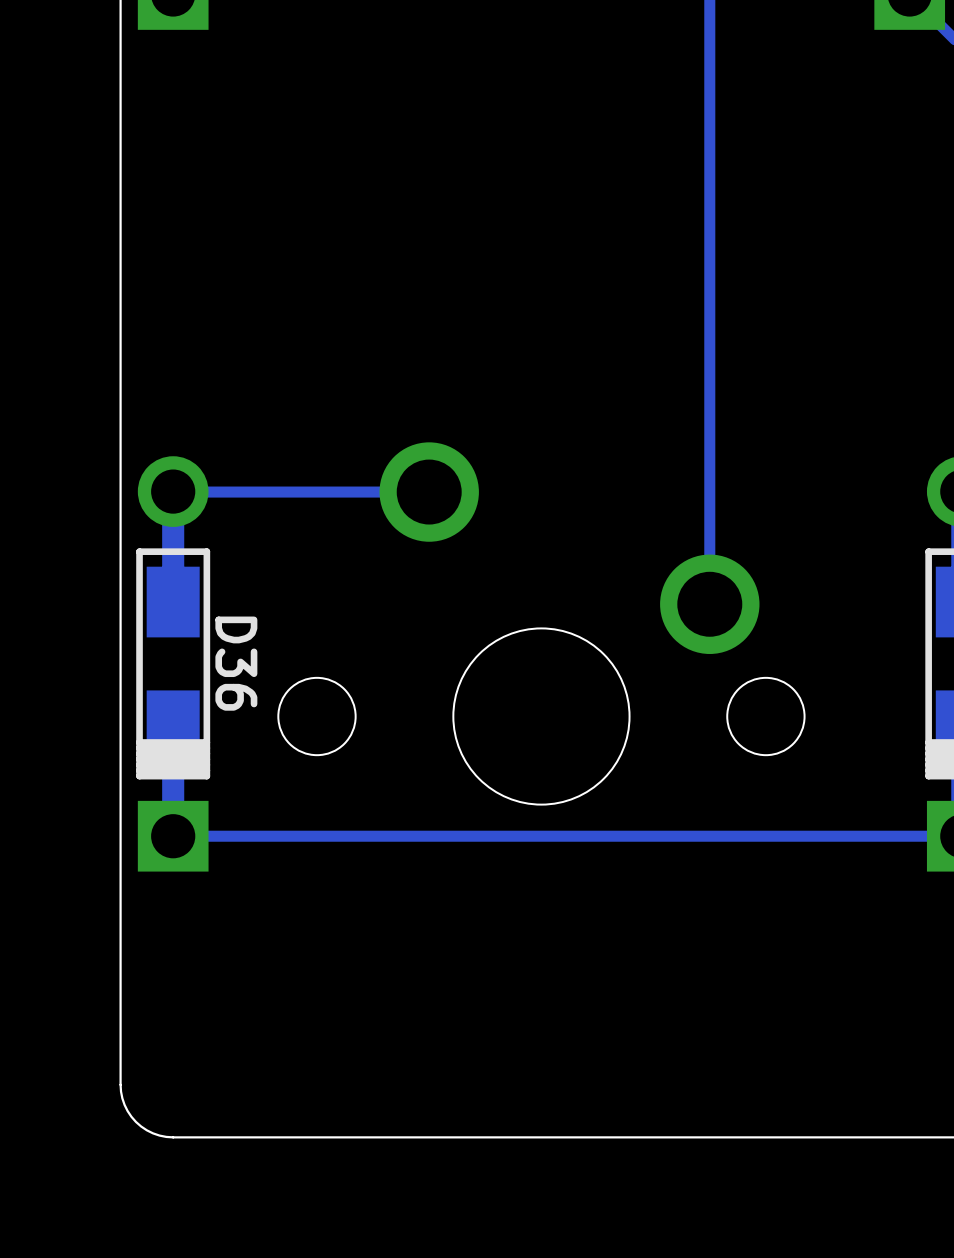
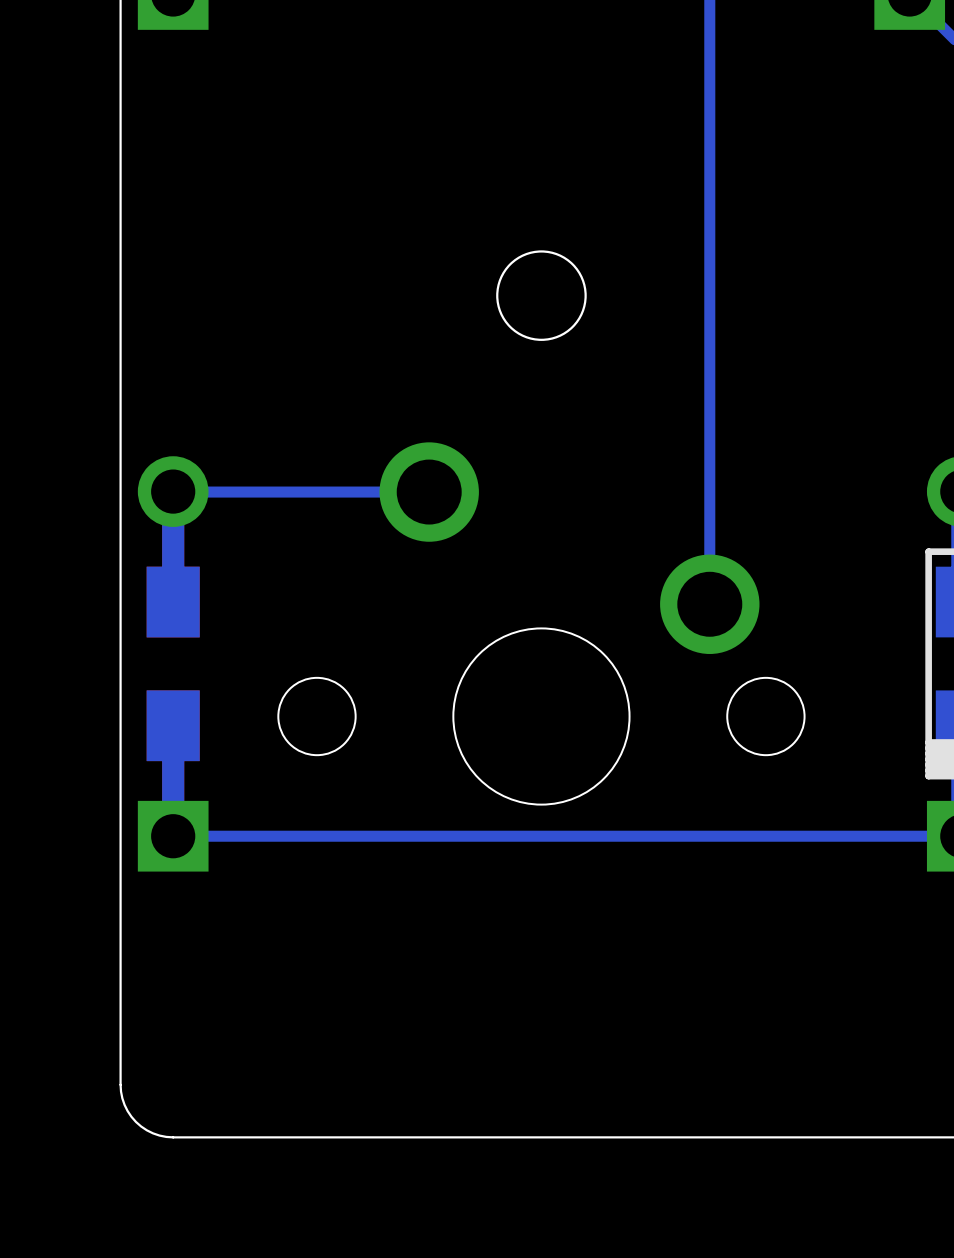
round board edge: none -> [496, 250, 587, 341]
D36: (173, 663) -> none
part: none -> (173, 663)

